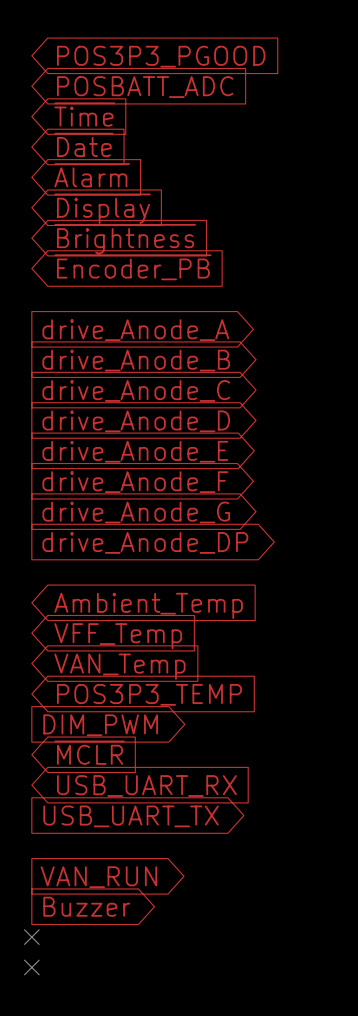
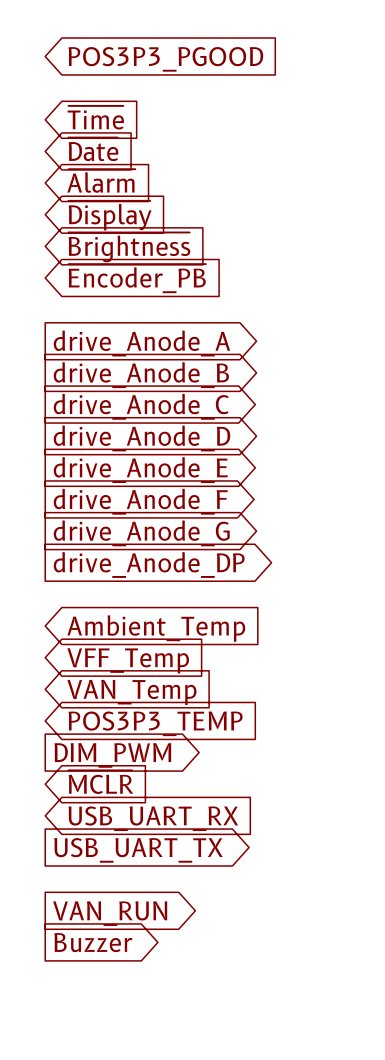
global label: POSBATT_ADC (145, 87) -> none
no-connect mark: (31, 937) -> none
no-connect mark: (31, 967) -> none

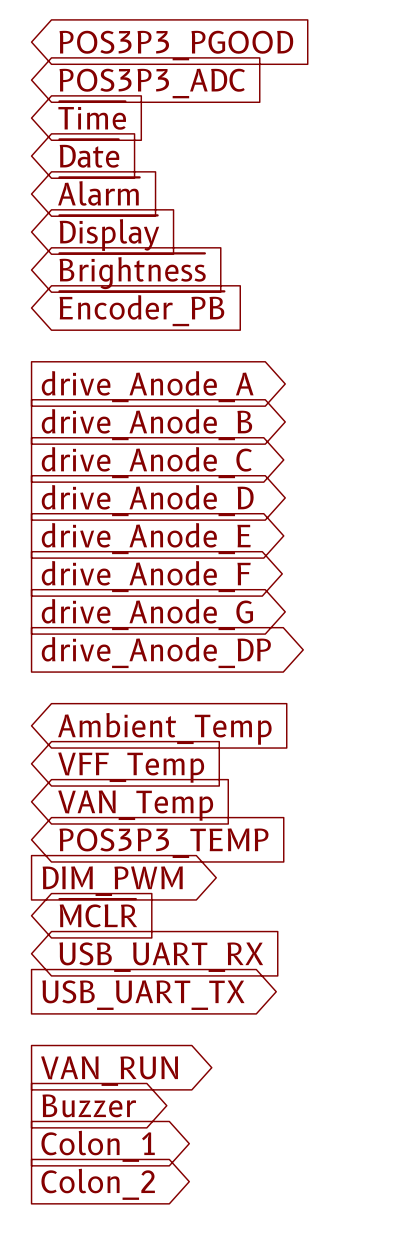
global label: none -> POS3P3_ADC (152, 83)
global label: none -> Colon_1 (98, 1146)
global label: none -> Colon_2 (98, 1184)

